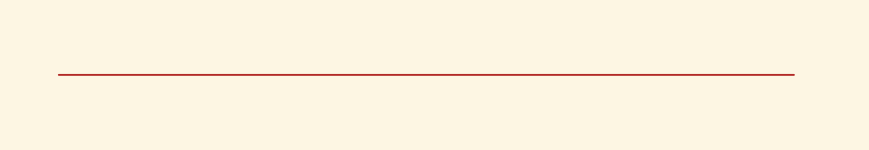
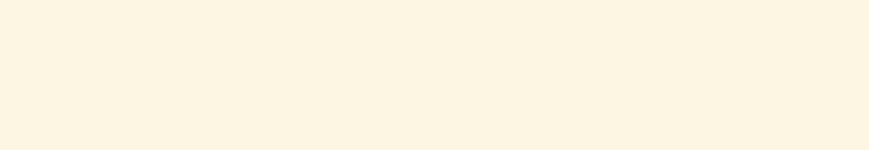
part: (426, 74) -> none

